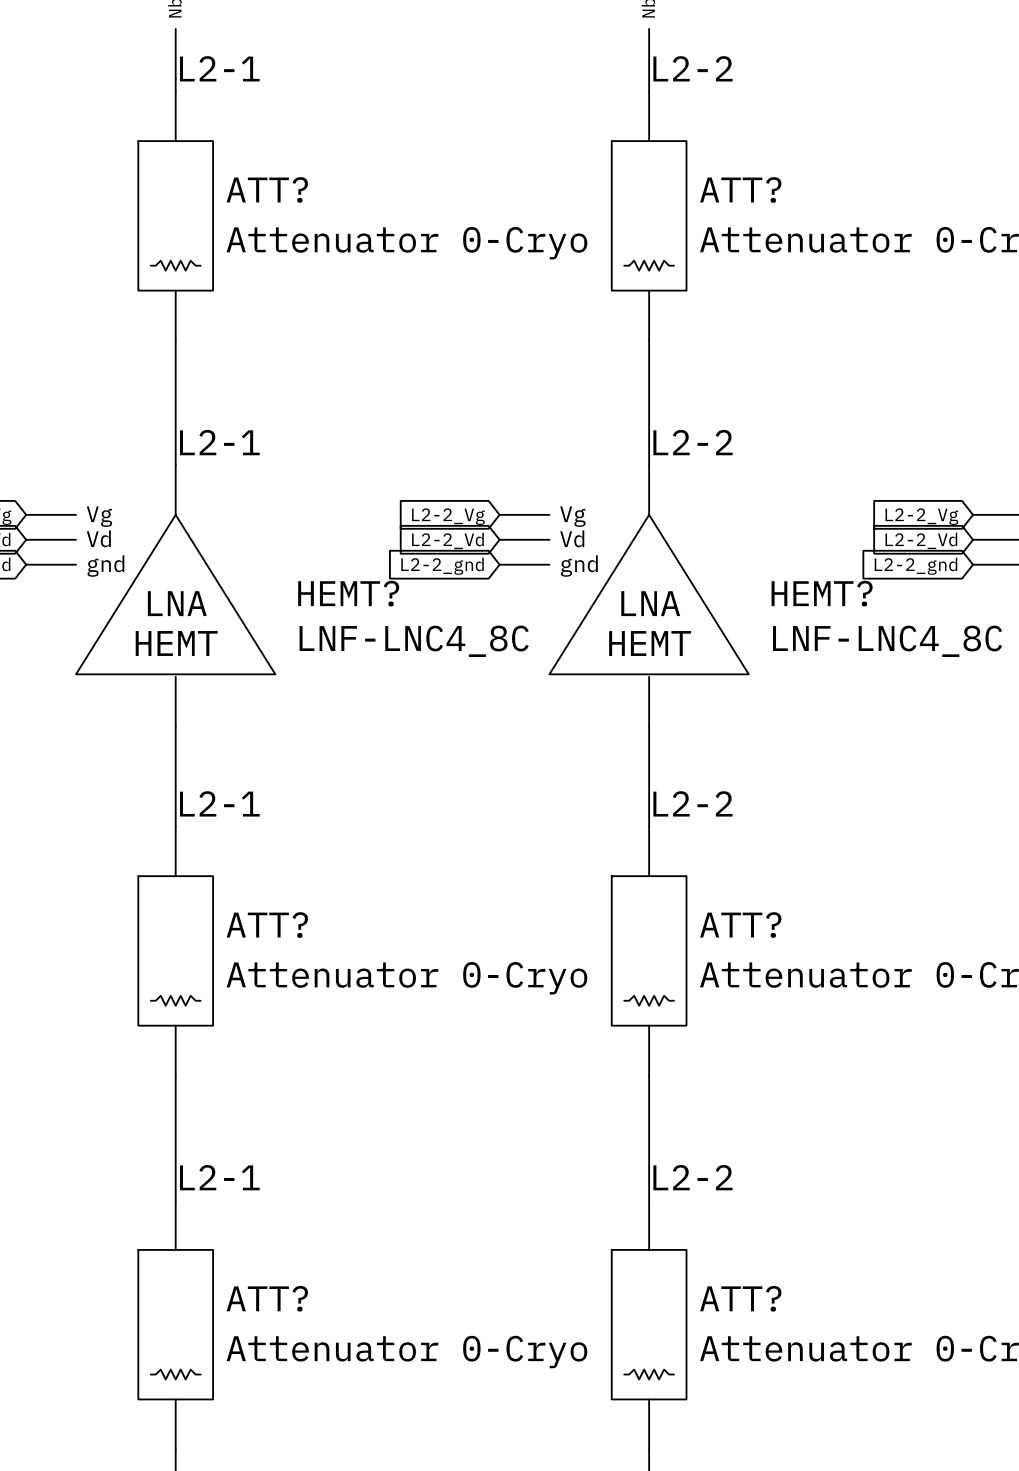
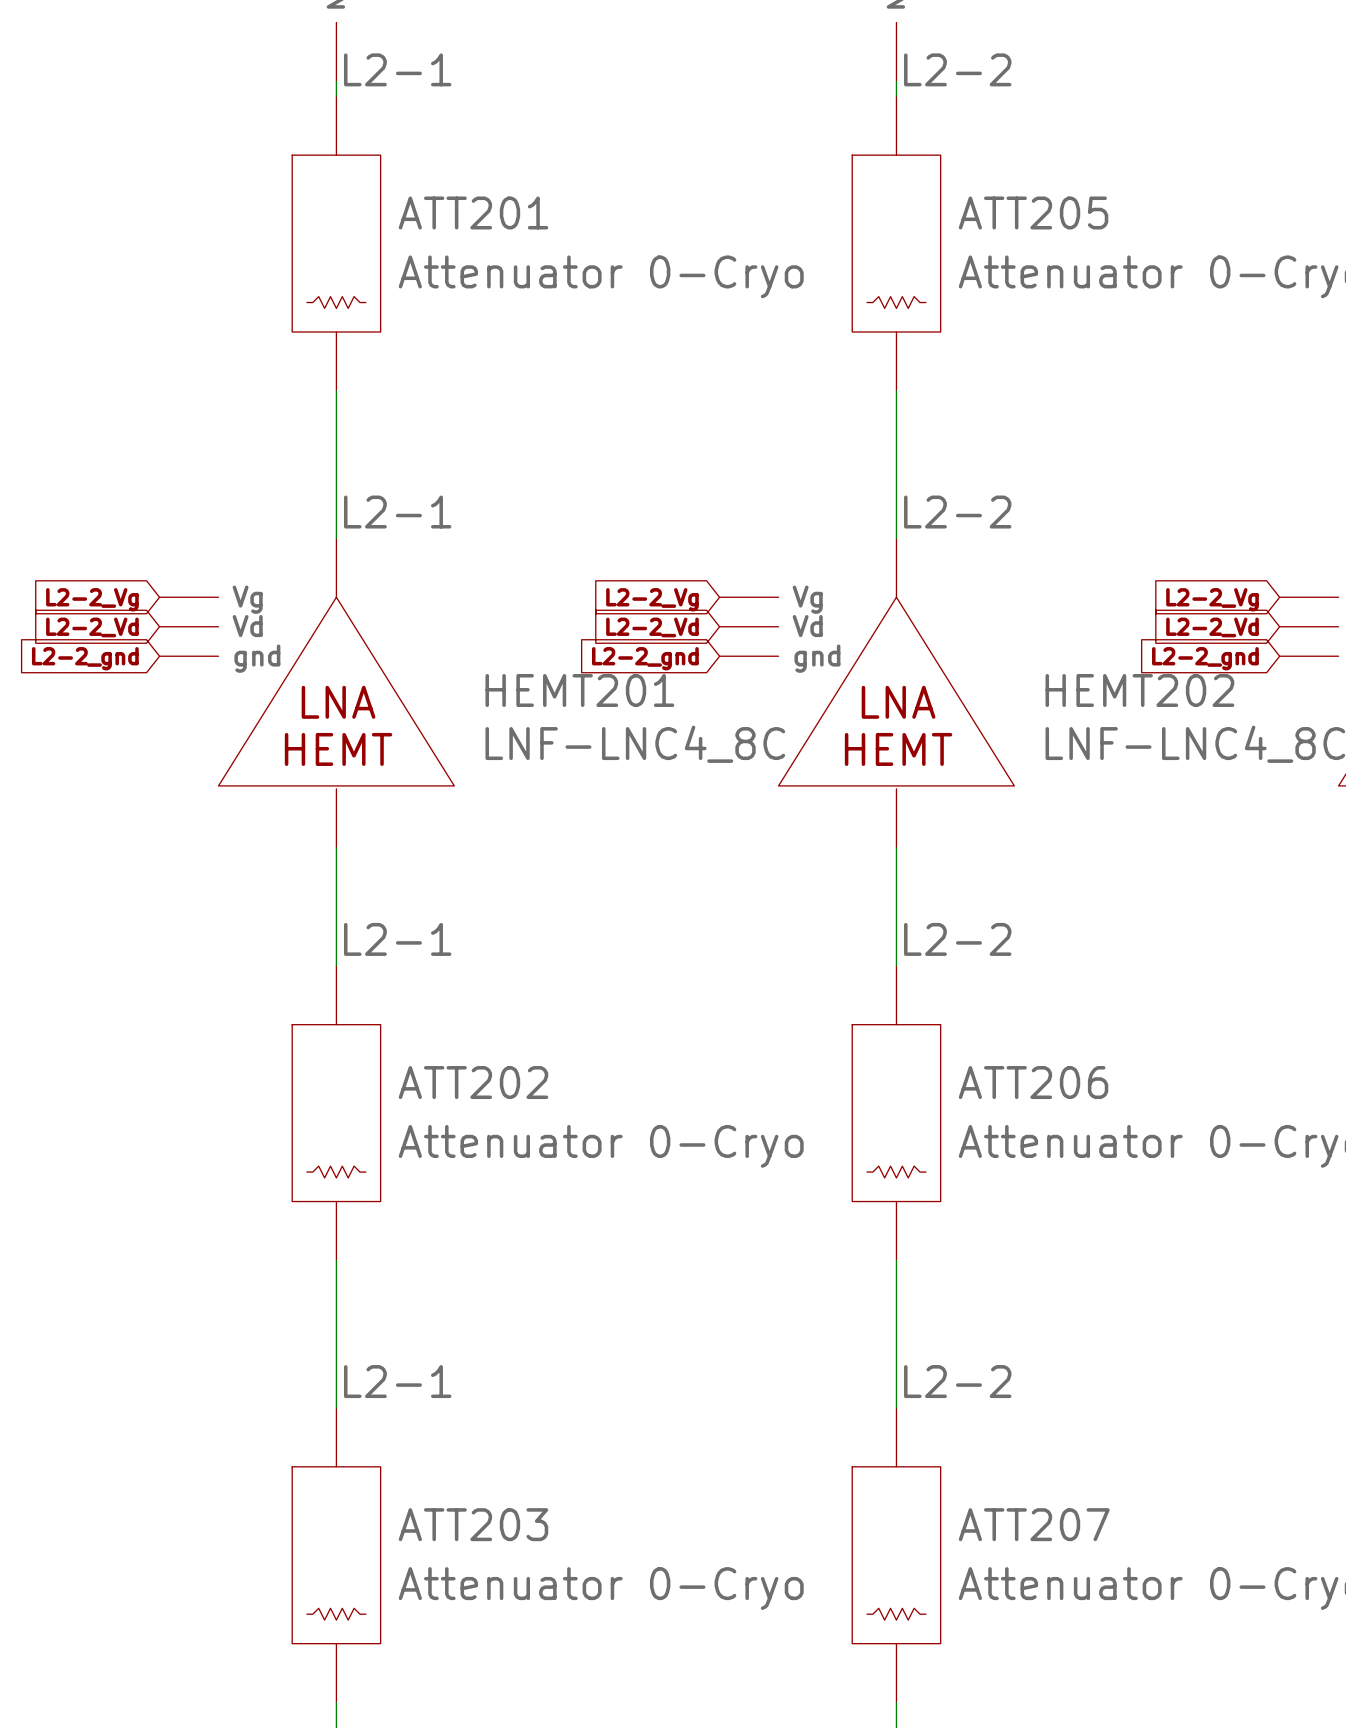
ATT? name: ATT? (267, 189) -> ATT201 (473, 212)
ATT? name: ATT? (740, 189) -> ATT205 (1033, 212)
HEMT? name: HEMT? (348, 593) -> HEMT201 (579, 690)
HEMT? name: HEMT? (822, 593) -> HEMT202 (1139, 690)
ATT? name: ATT? (267, 925) -> ATT202 (473, 1082)
ATT? name: ATT? (740, 925) -> ATT206 (1033, 1082)
ATT? name: ATT? (267, 1298) -> ATT203 (473, 1524)
ATT? name: ATT? (740, 1298) -> ATT207 (1034, 1524)

